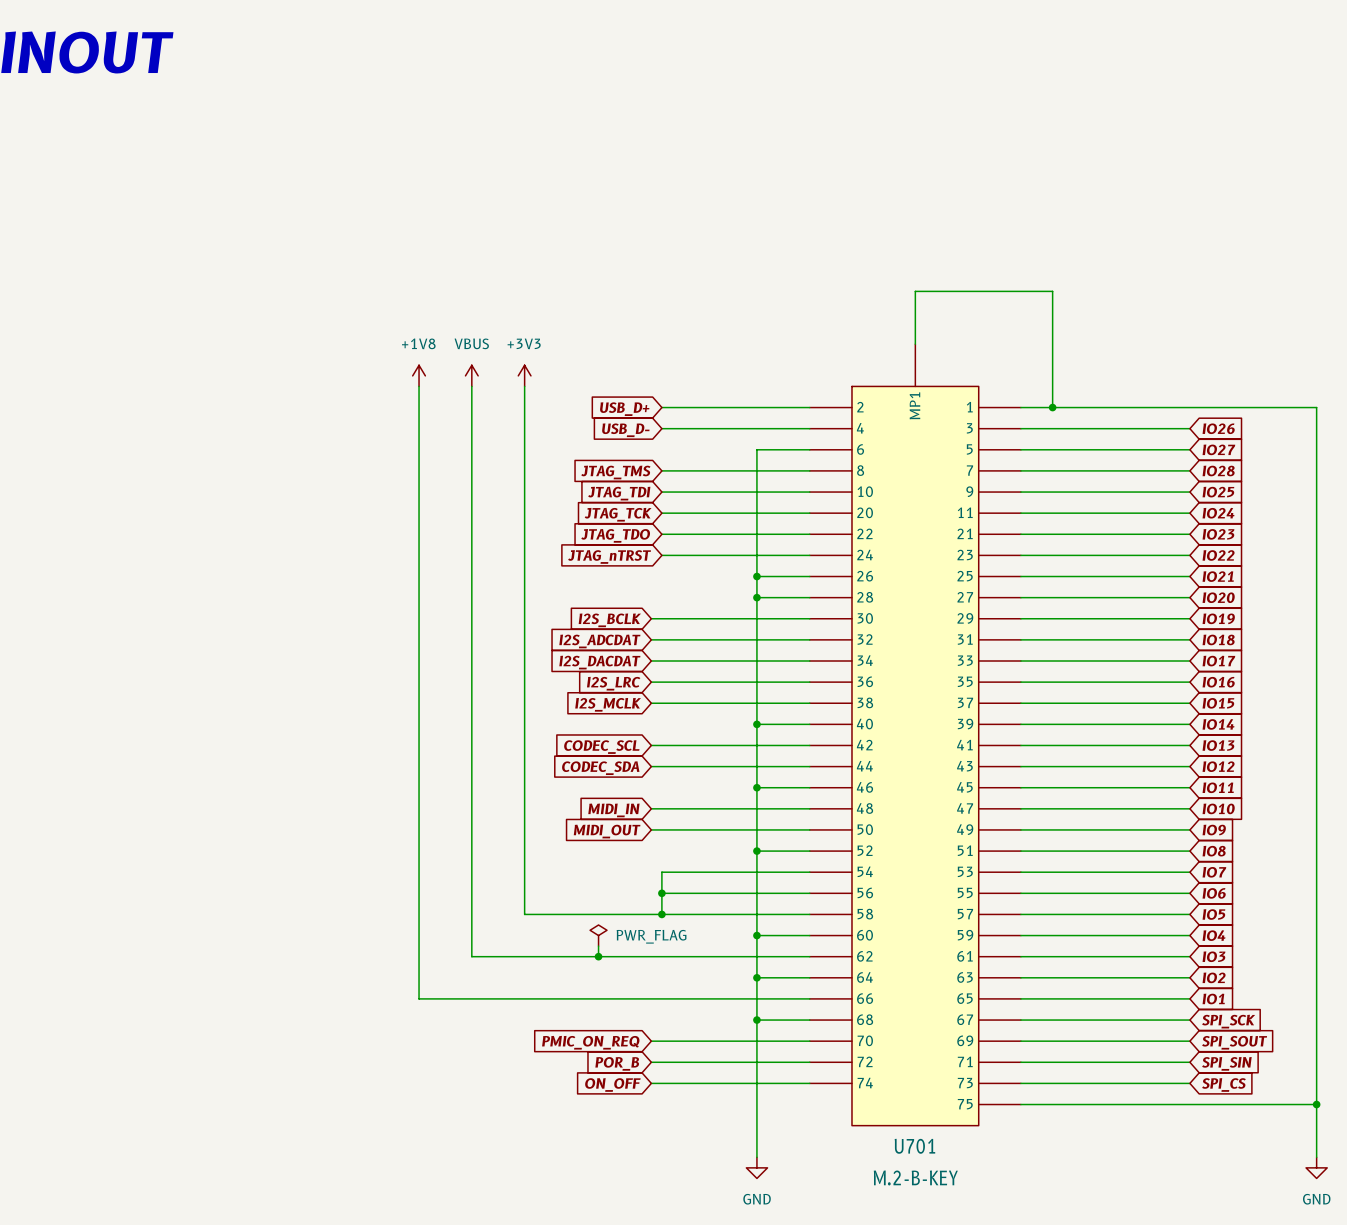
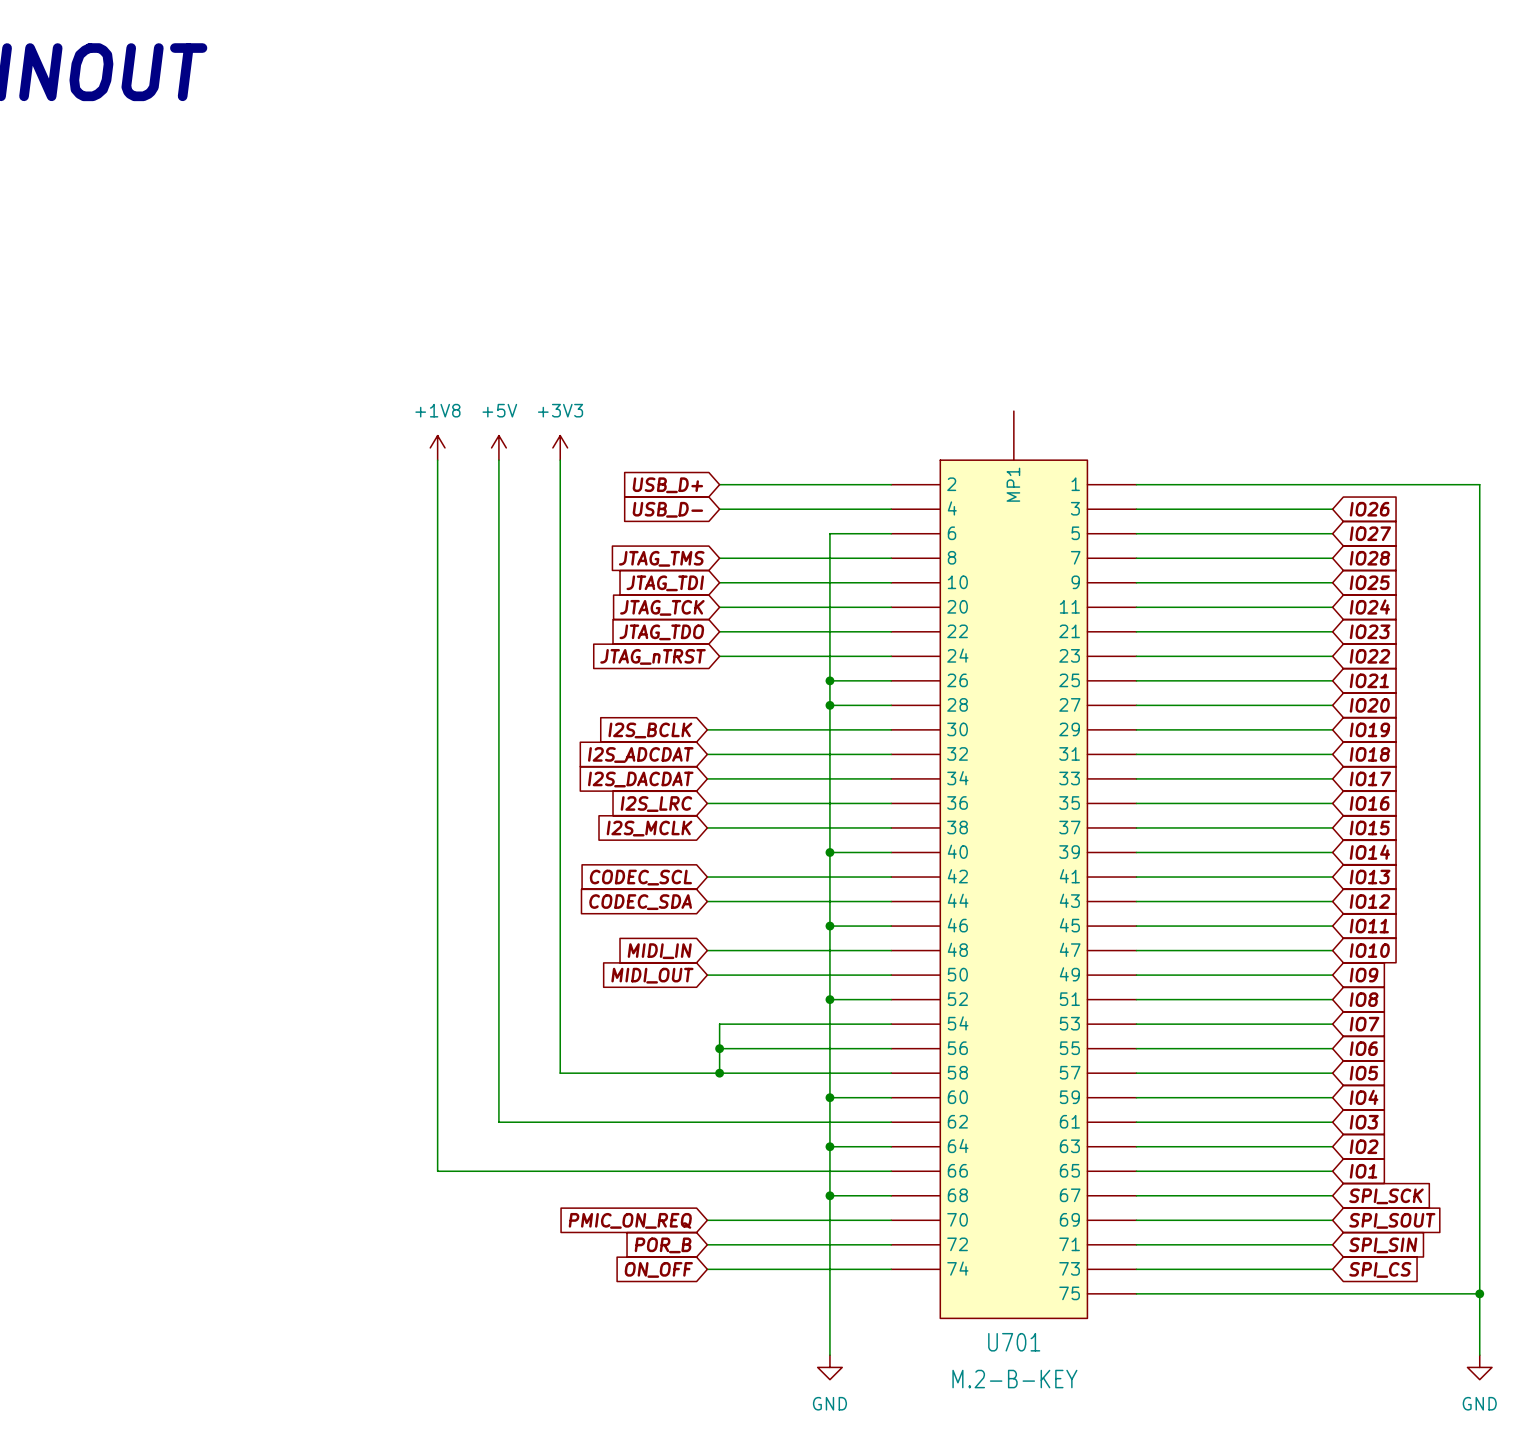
wire: (915, 344) (915, 291) (1052, 291) (1052, 407) -> none
power symbol: VBUS (471, 375) -> +5V (498, 447)
junction: (1052, 407) -> none
power symbol: PWR_FLAG (598, 935) -> none
wire: (598, 946) (598, 956) -> none
junction: (598, 956) -> none

